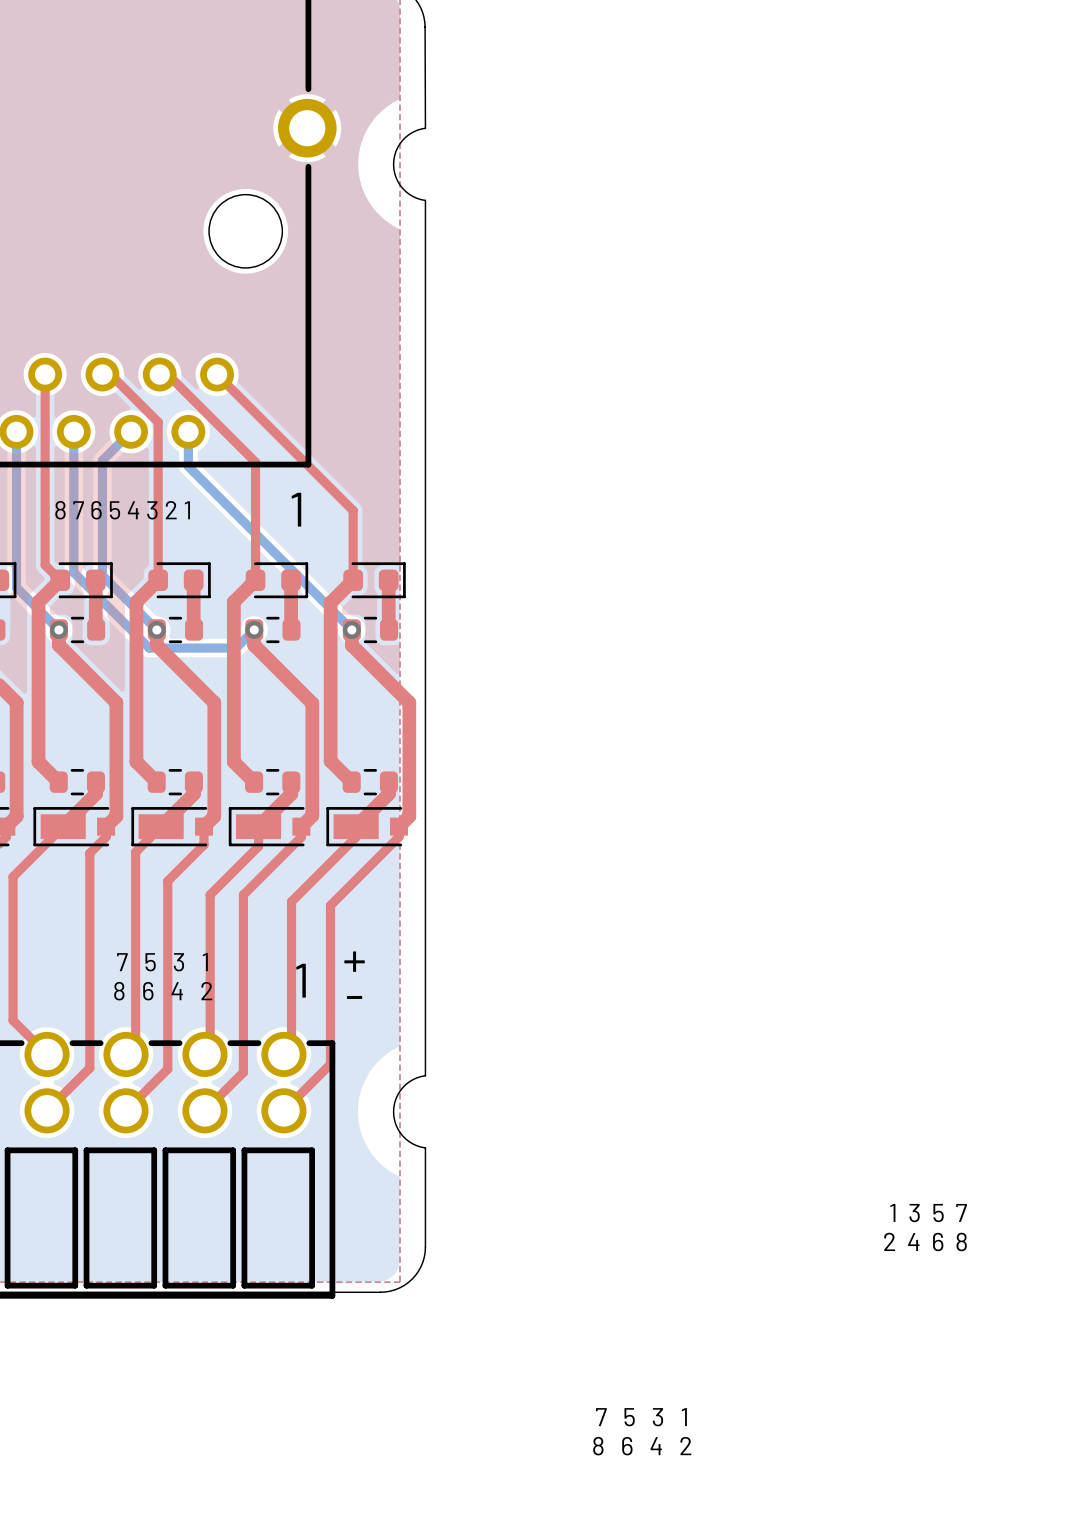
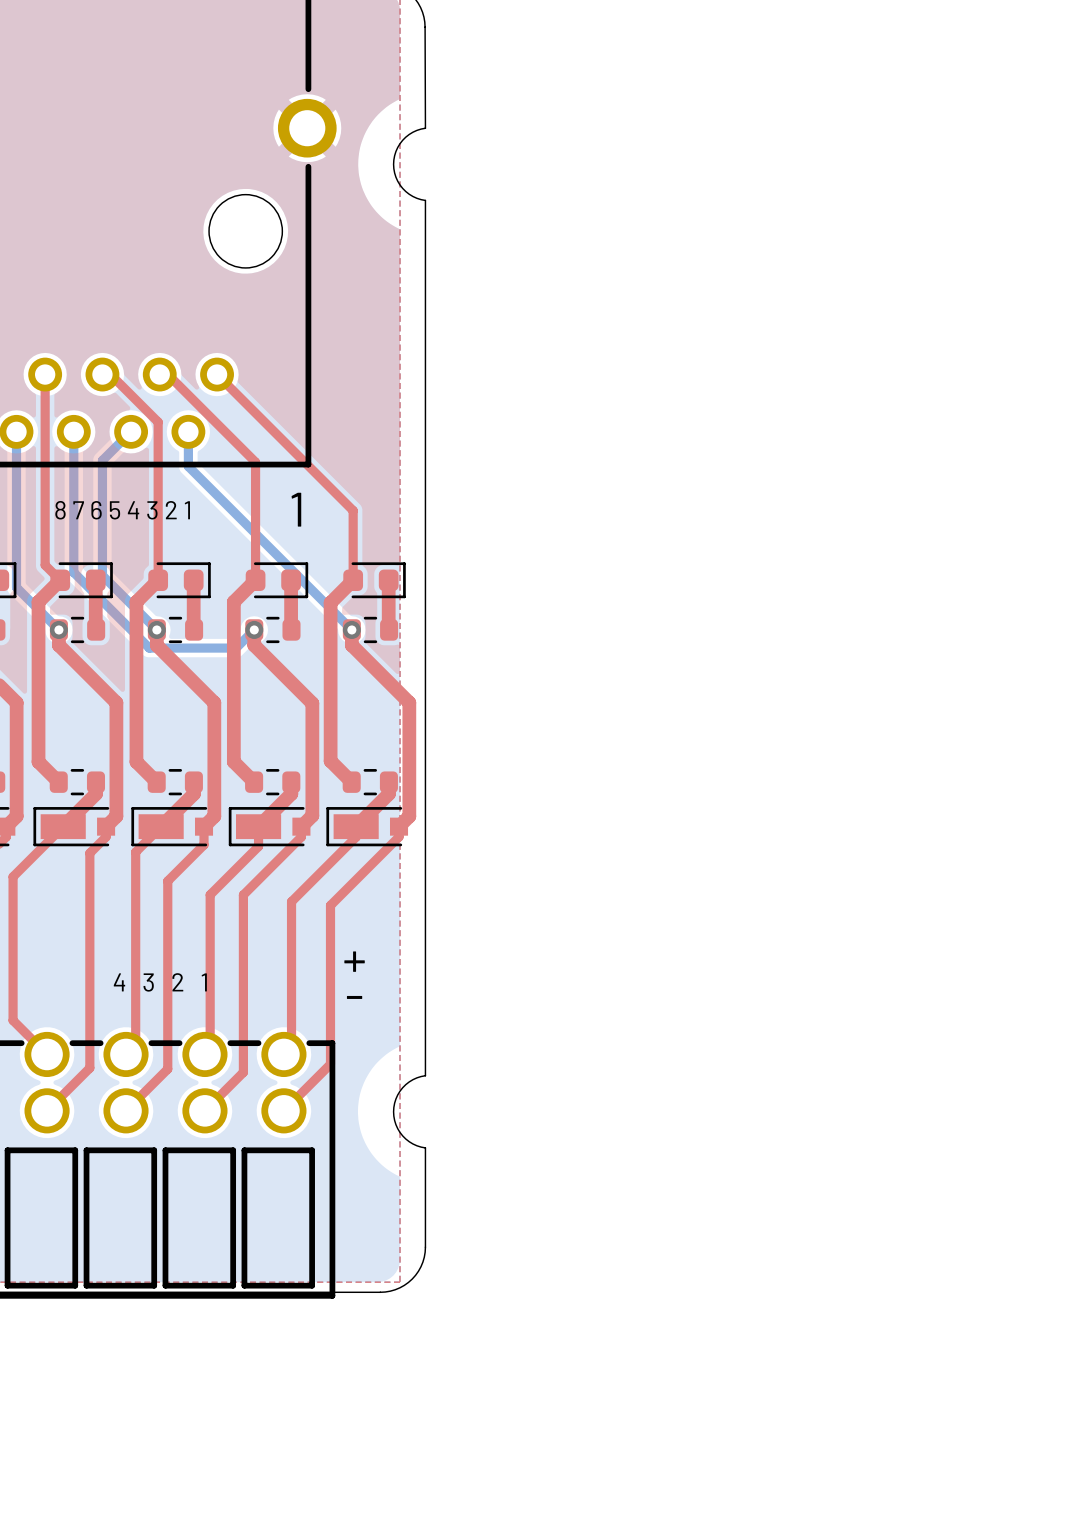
text: 7 5 3 1 (162, 962) -> none
text: 1 (301, 980) -> none
text: 8 6 4 2 (163, 991) -> 4 3 2 1 (160, 982)
text: 1 3 5 7 (928, 1213) -> none
text: 2 4 6 8 (925, 1241) -> none
text: 7 5 3 1 (641, 1417) -> none
text: 8 6 4 2 (642, 1446) -> none

